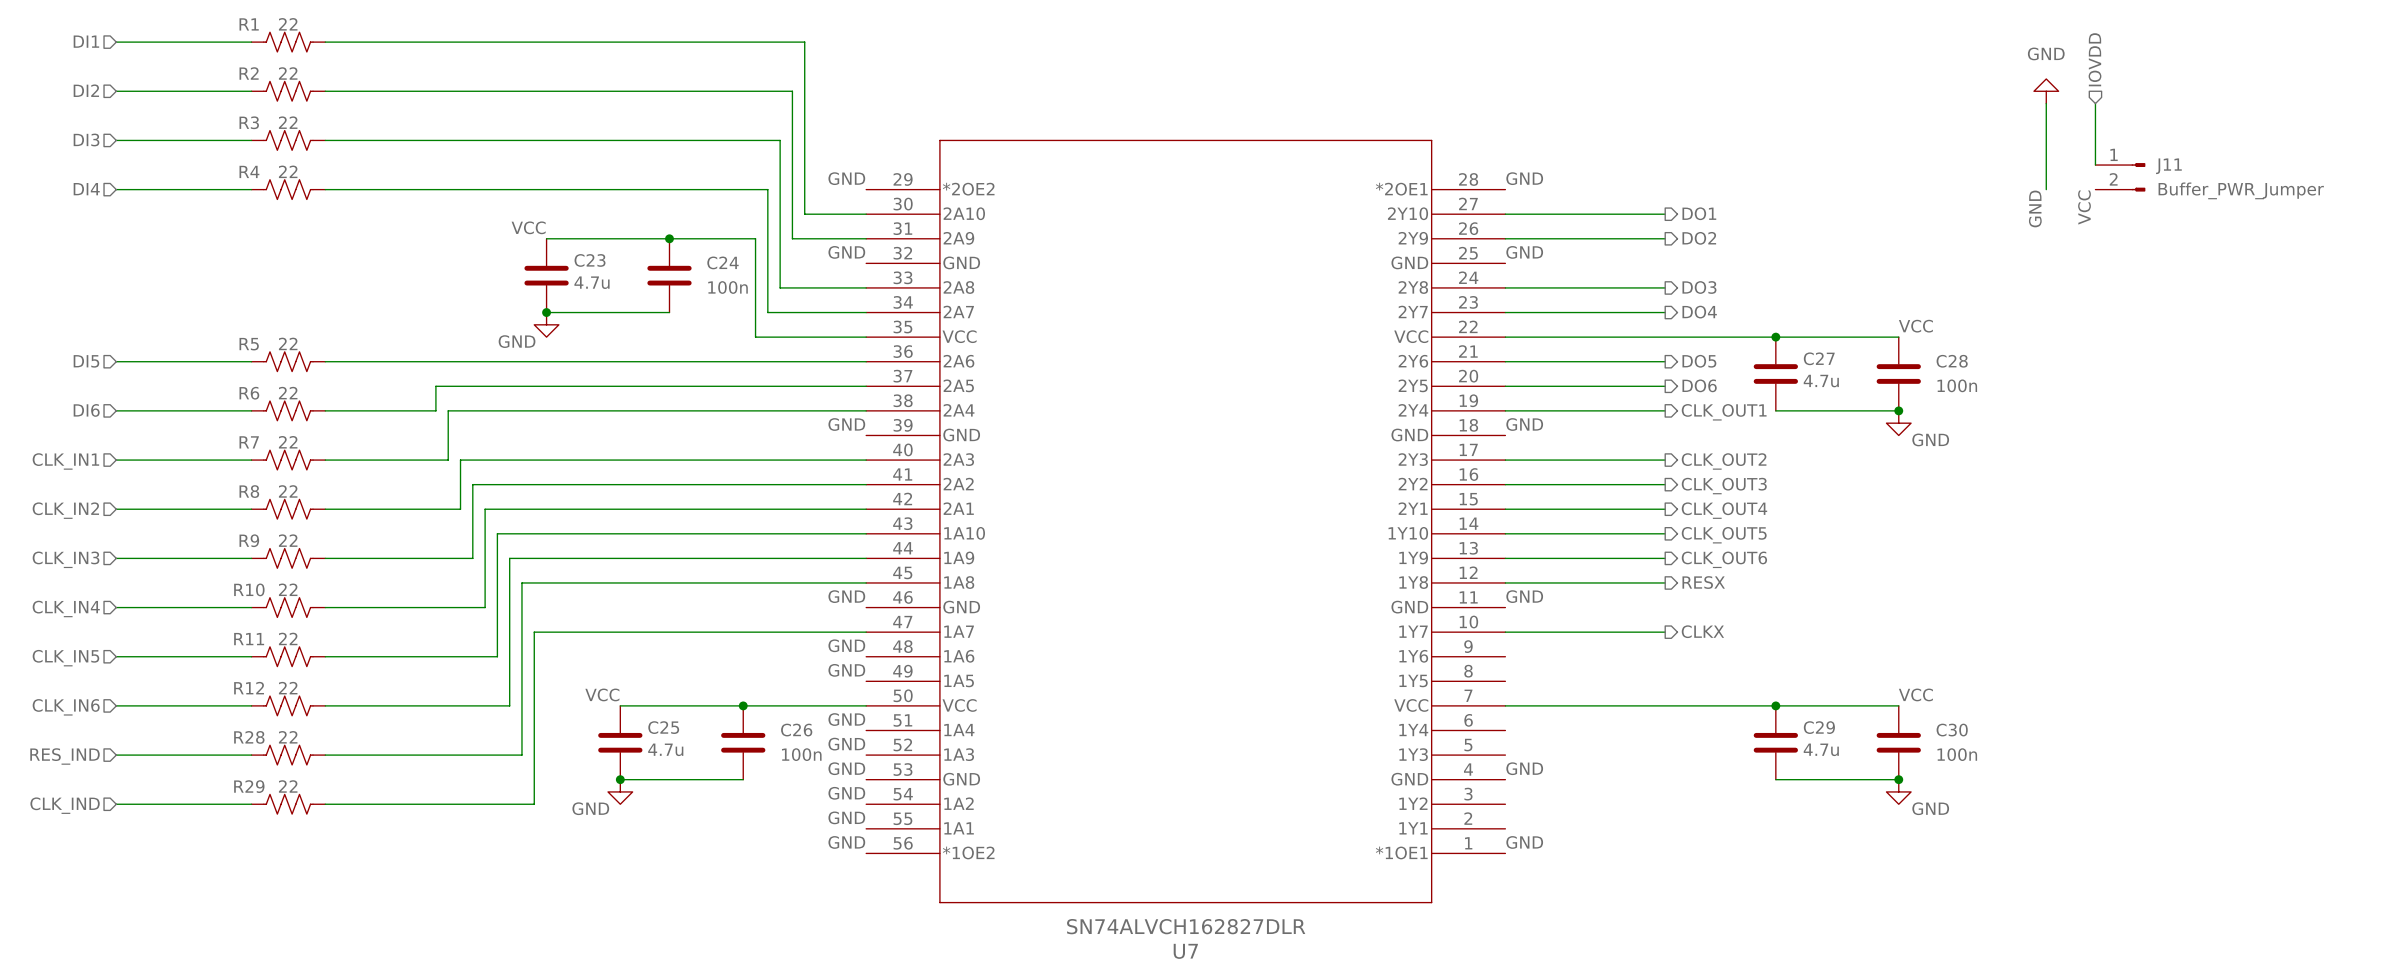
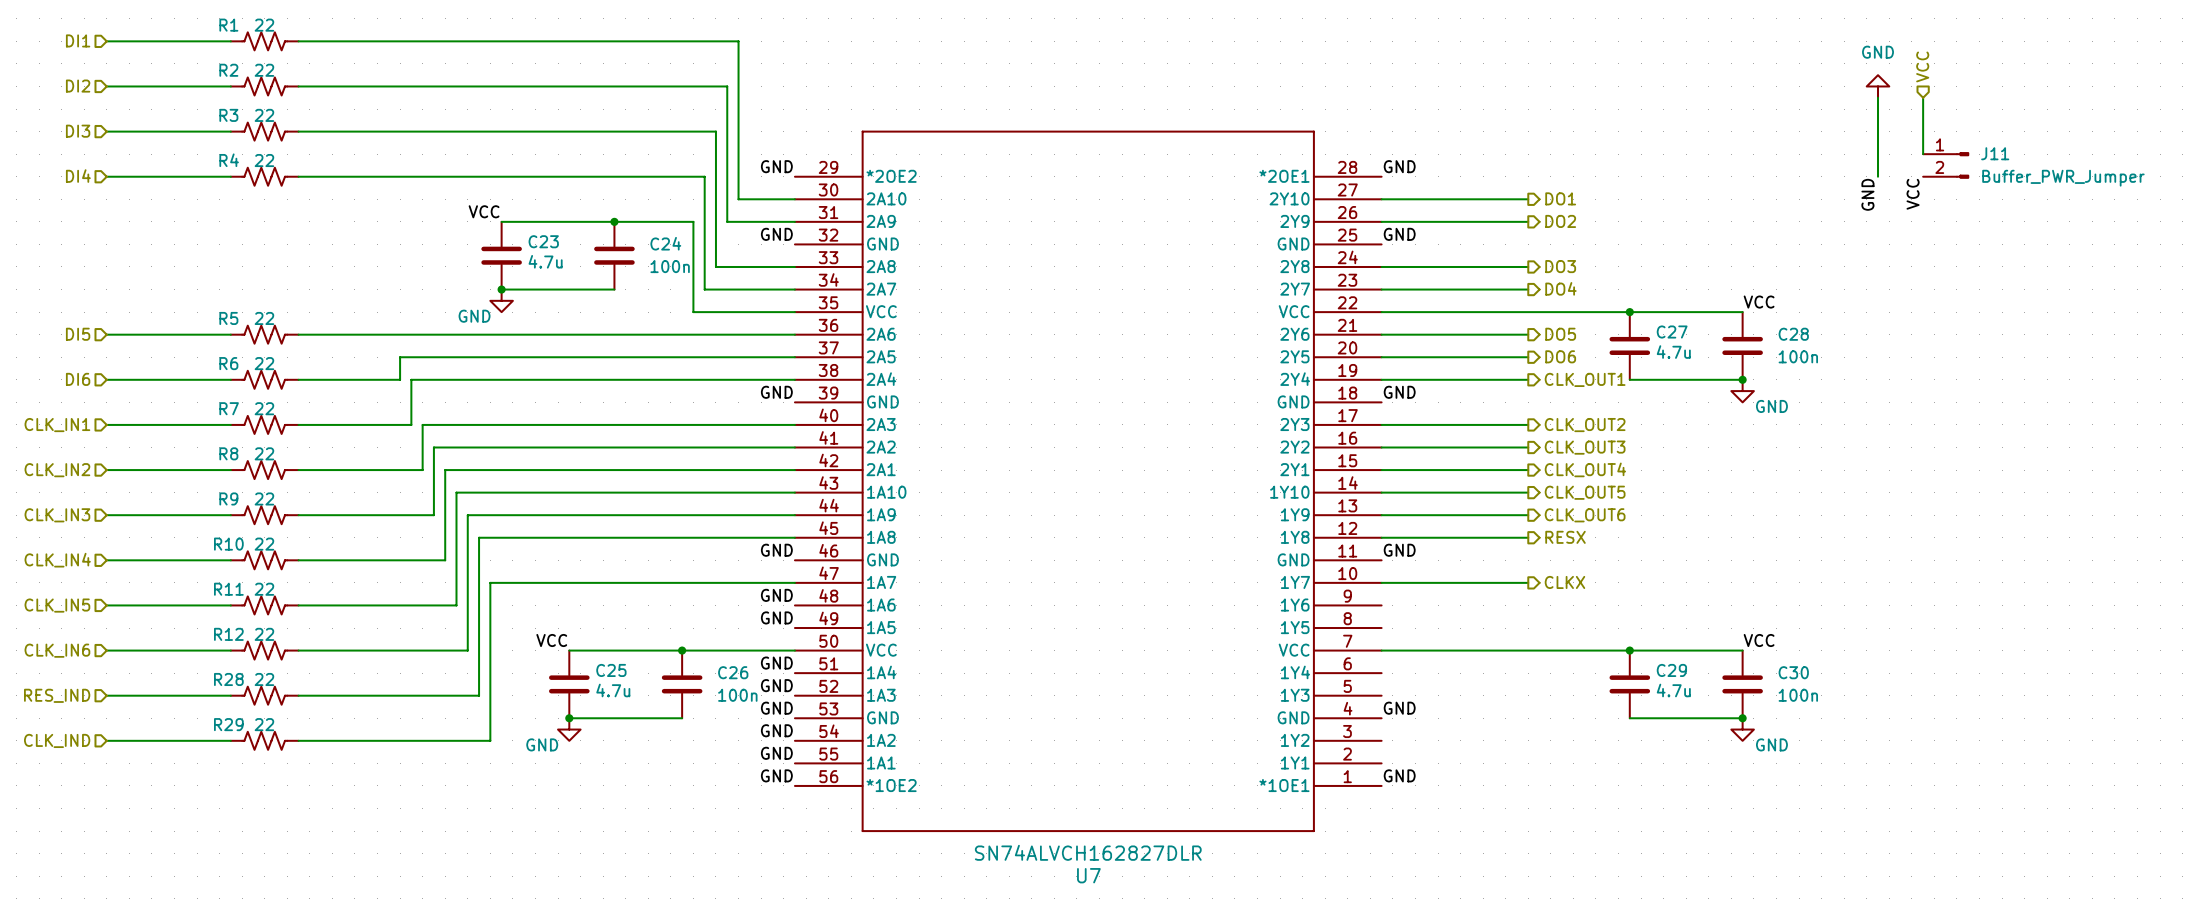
hierarchical label: IOVDD (2095, 59) -> VCC (1922, 66)

